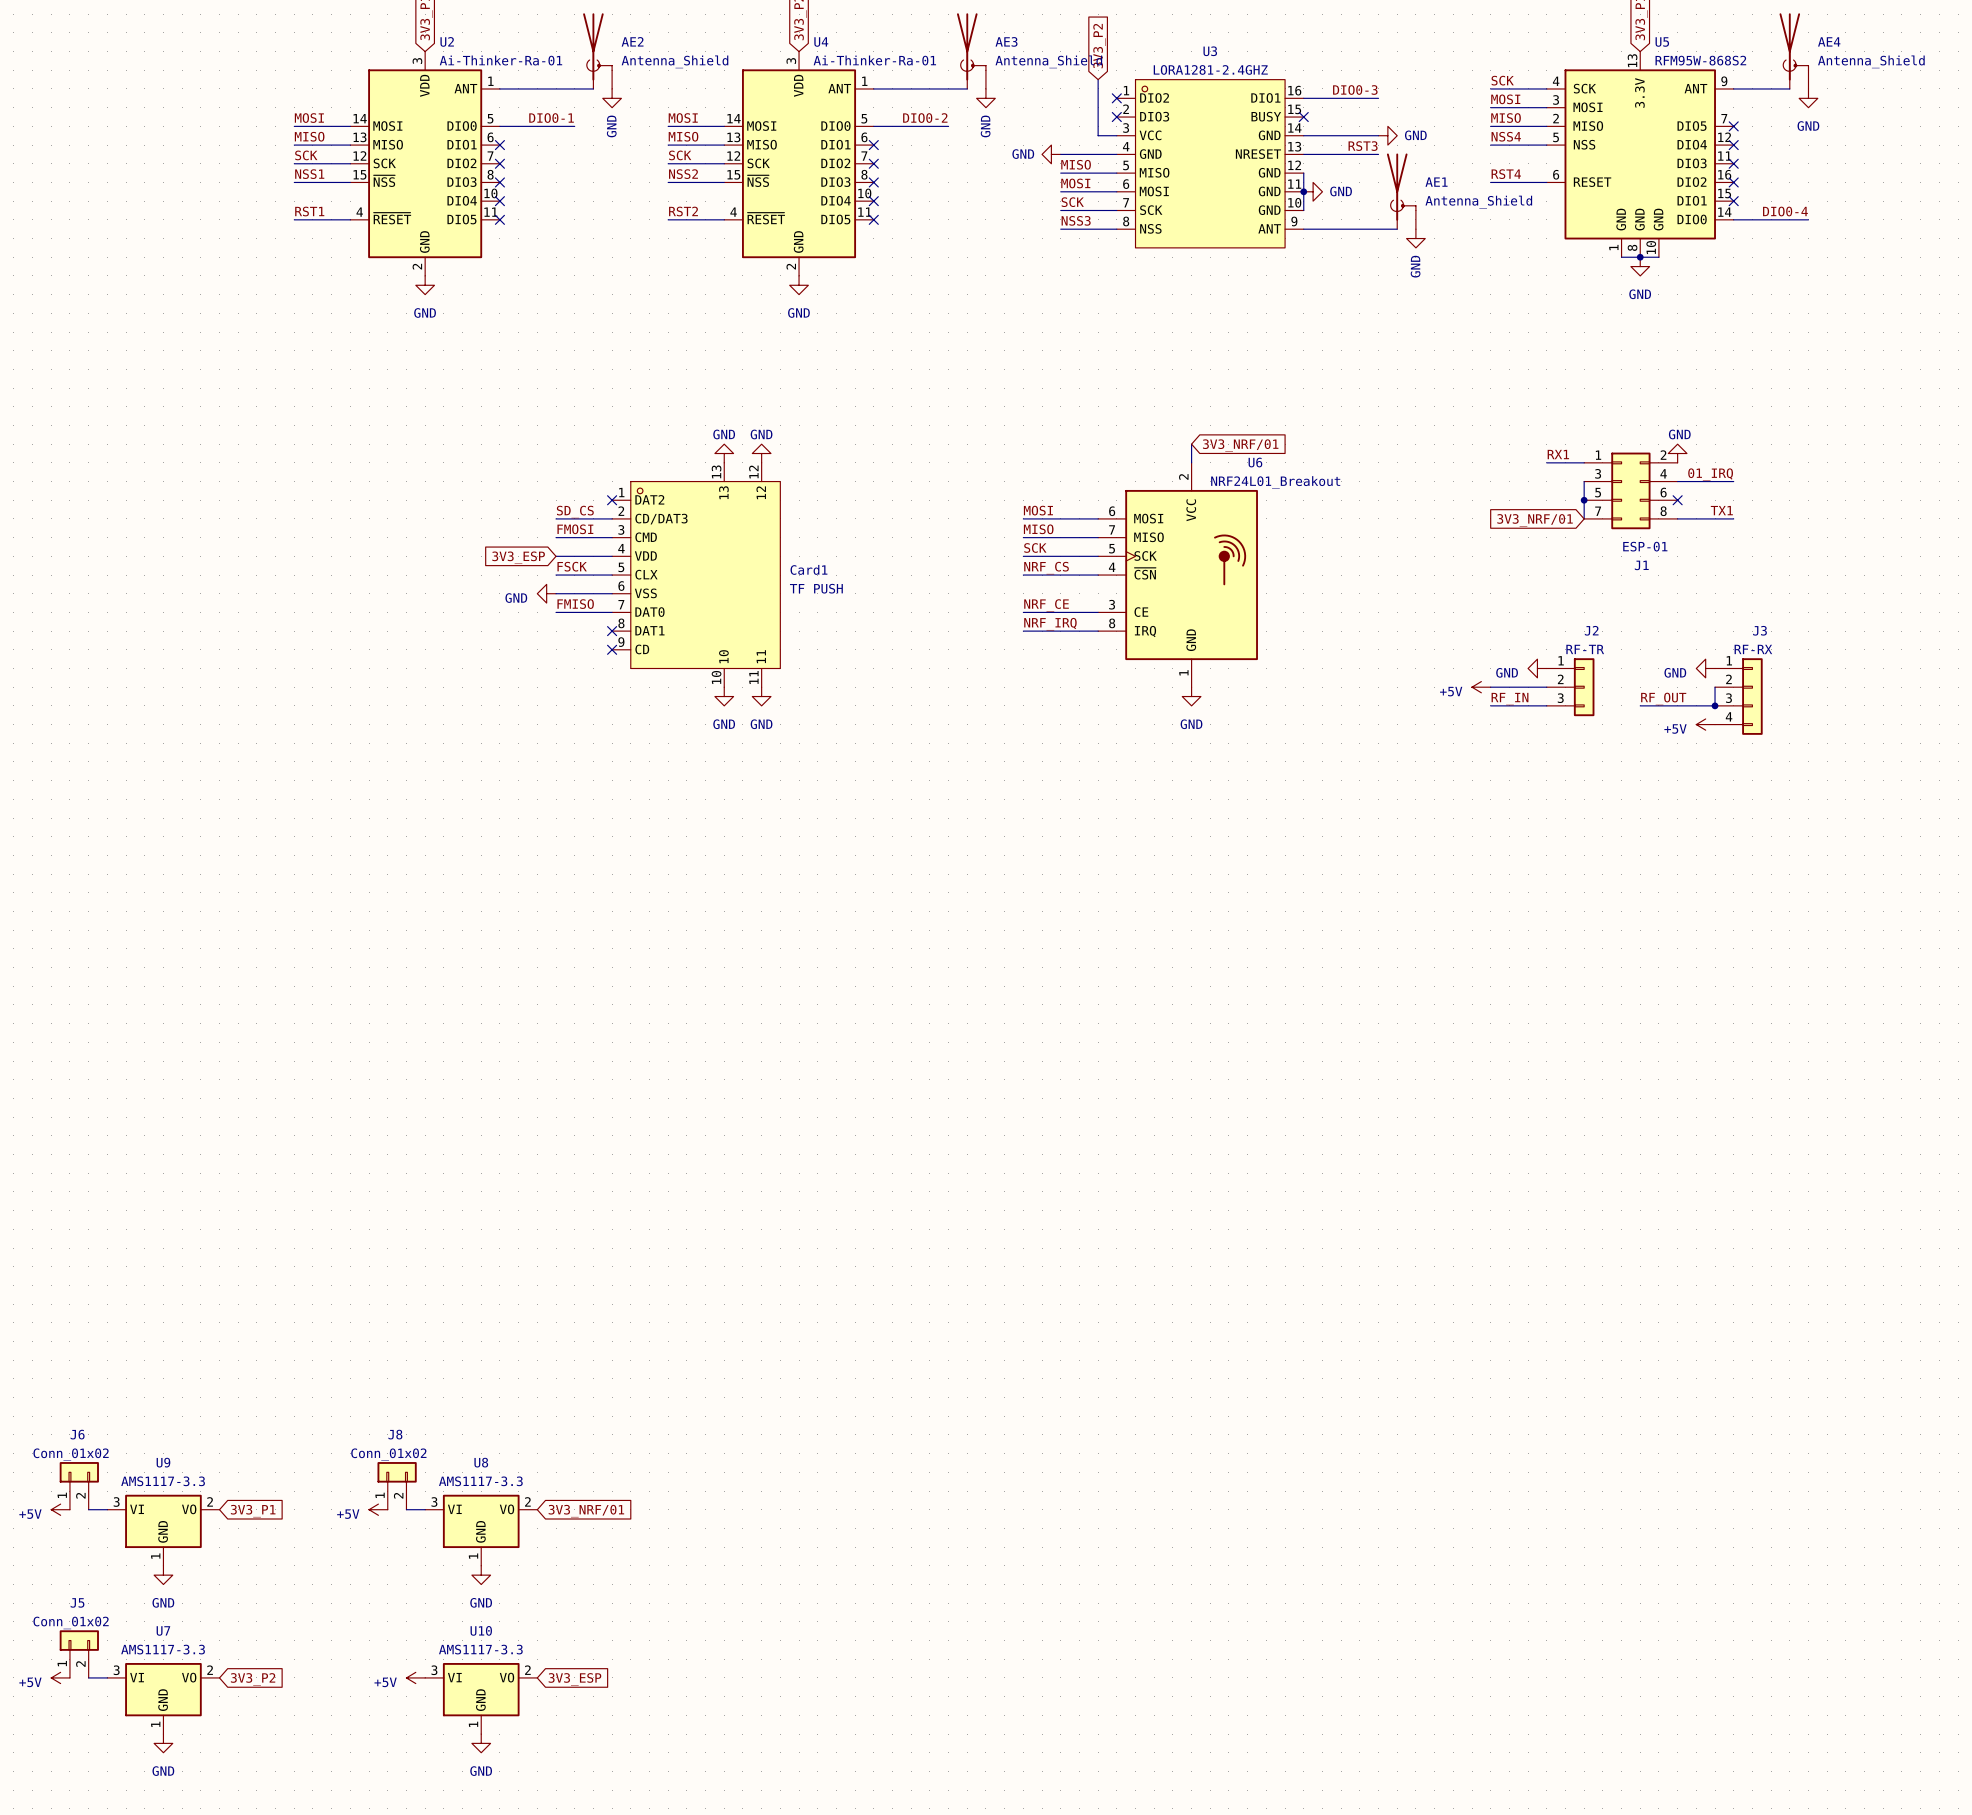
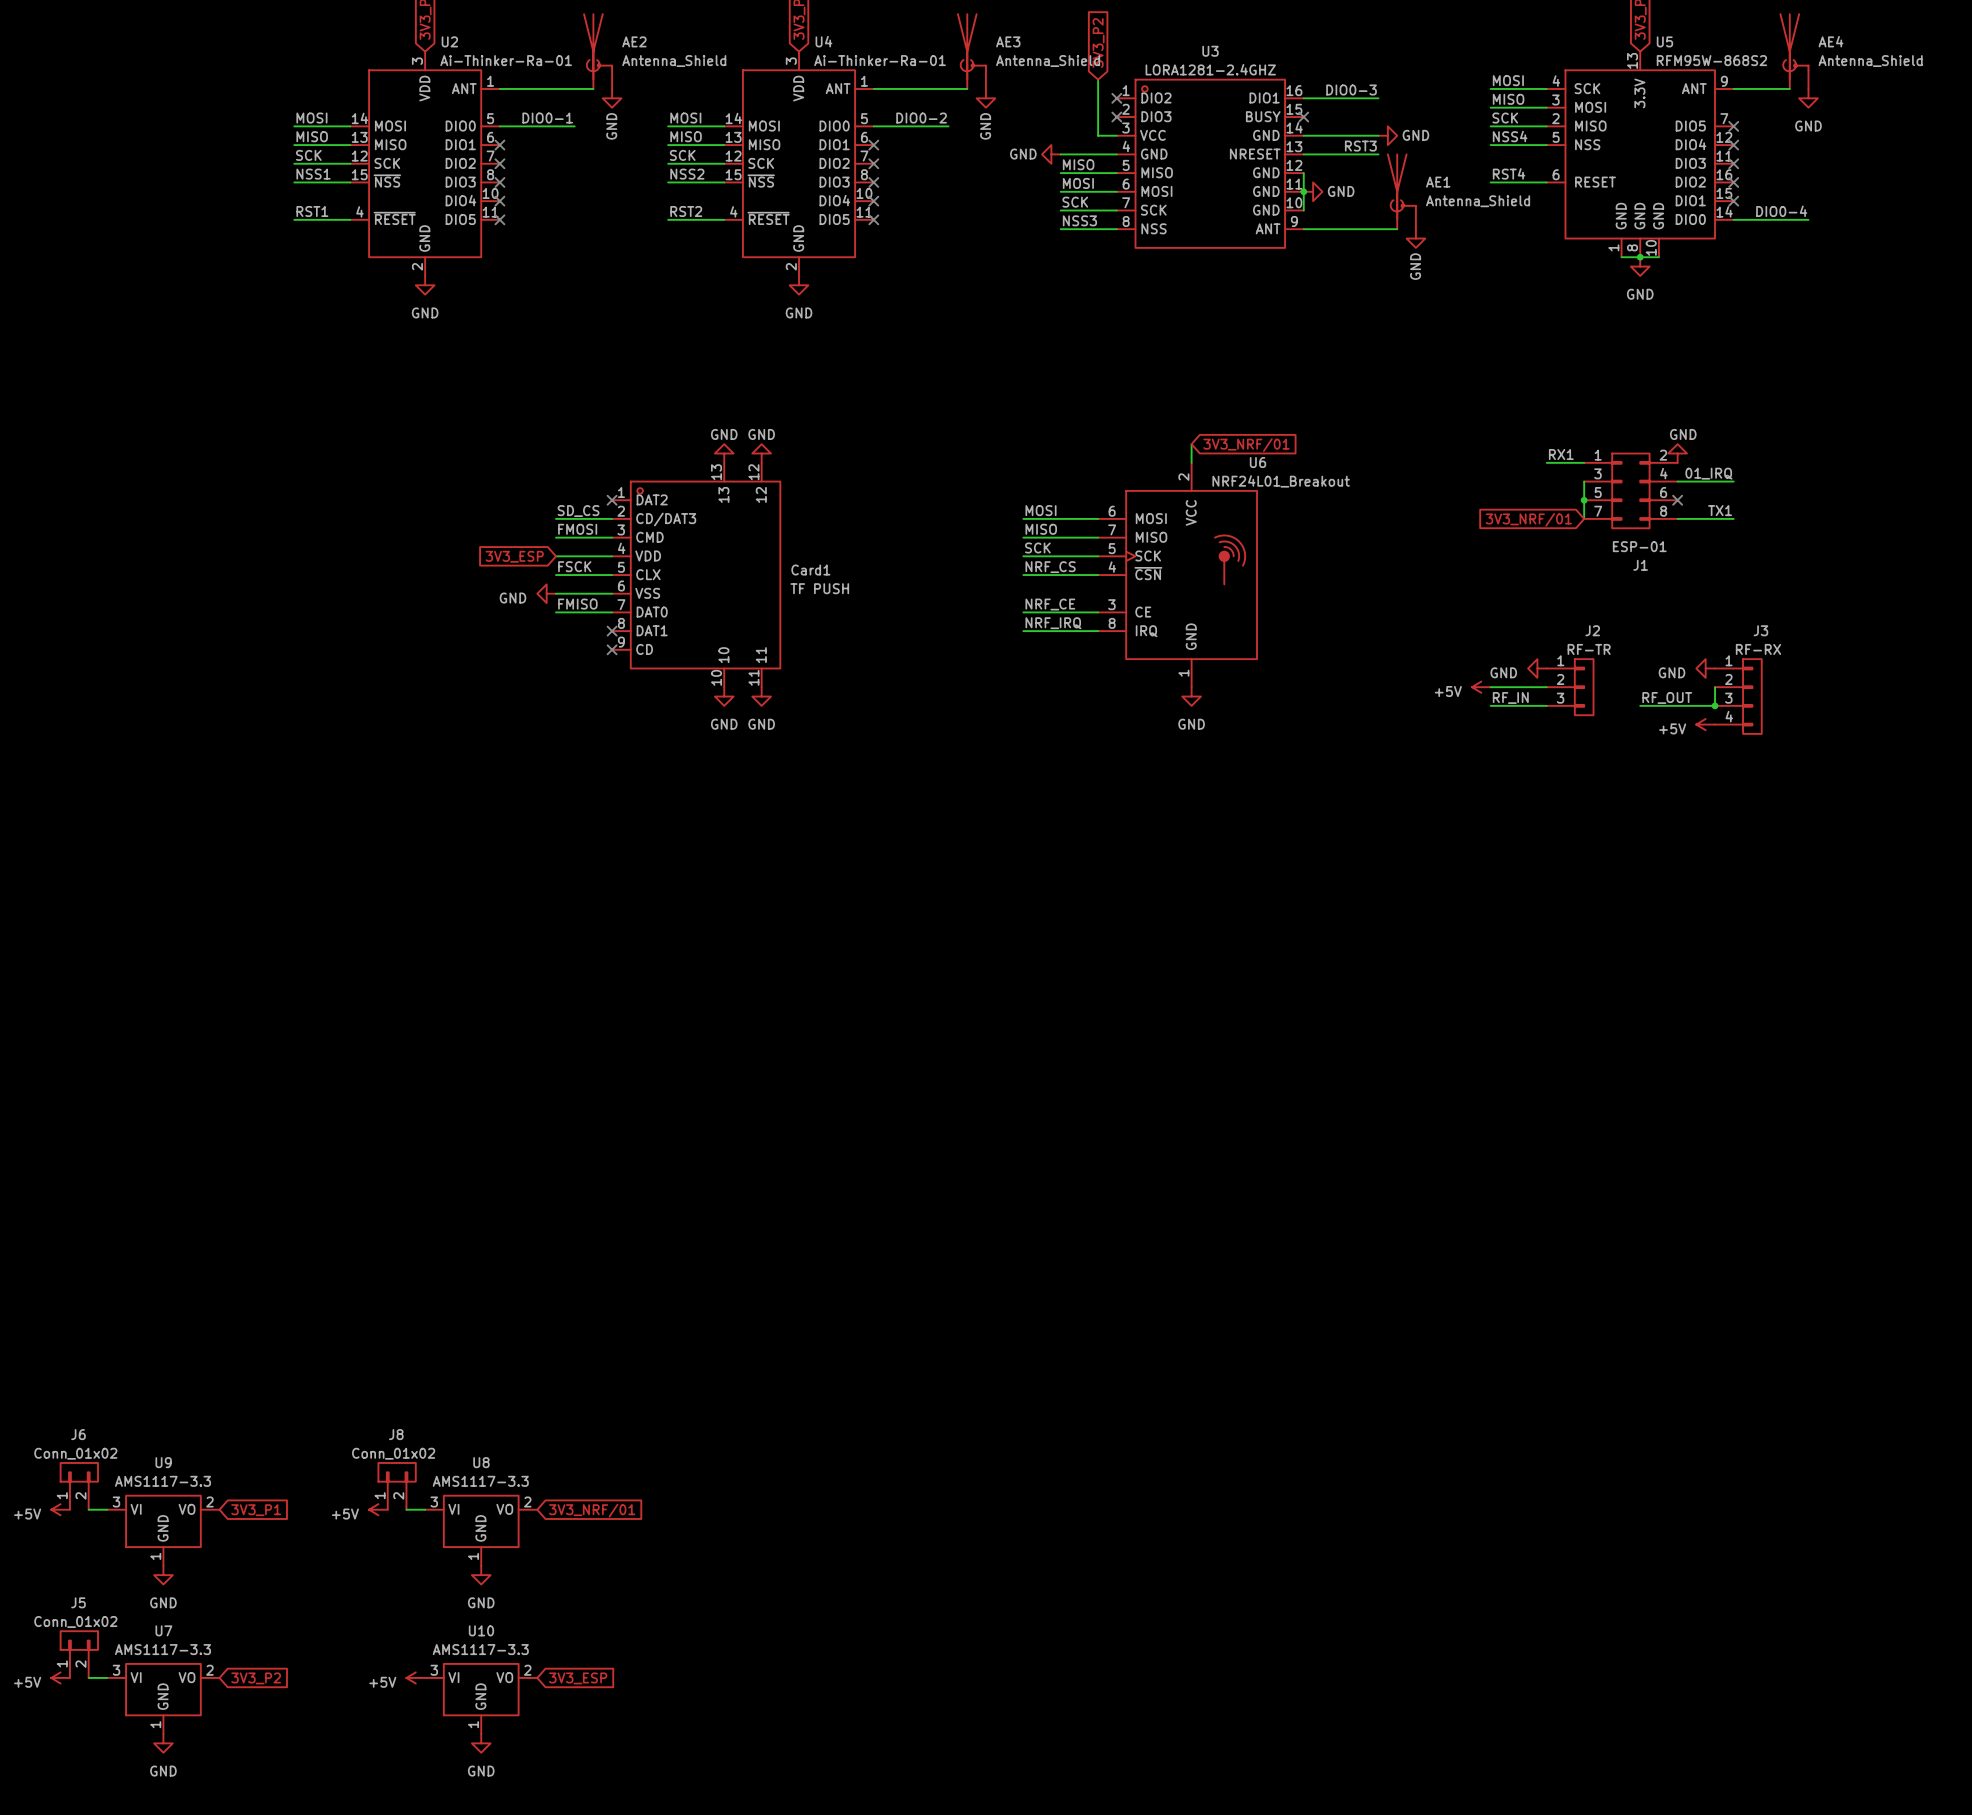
label: SCK (1502, 80) -> MOSI (1508, 80)
label: MOSI (1505, 99) -> MISO (1508, 99)
label: MISO (1506, 118) -> SCK (1505, 118)

